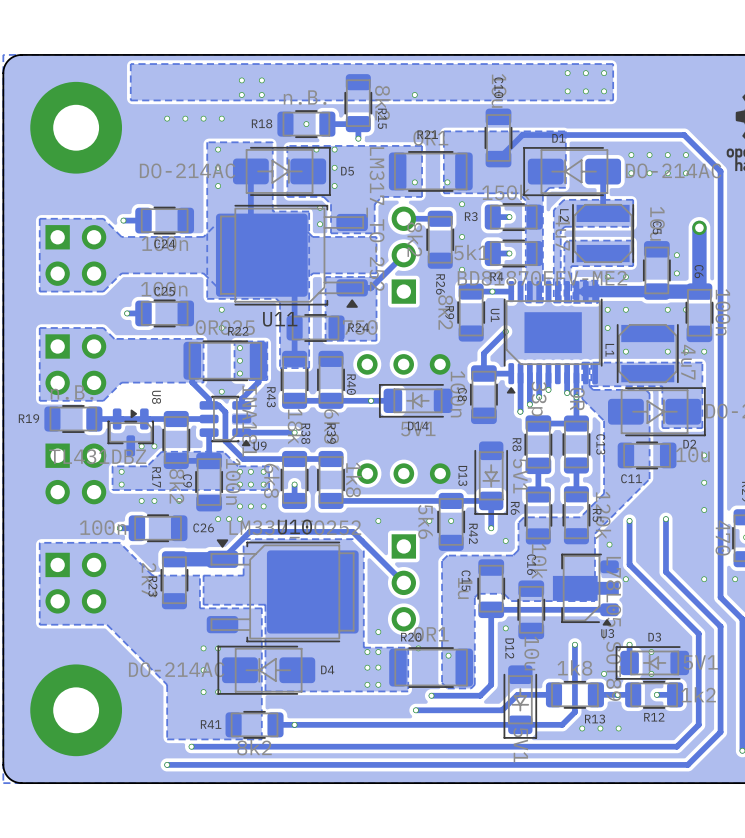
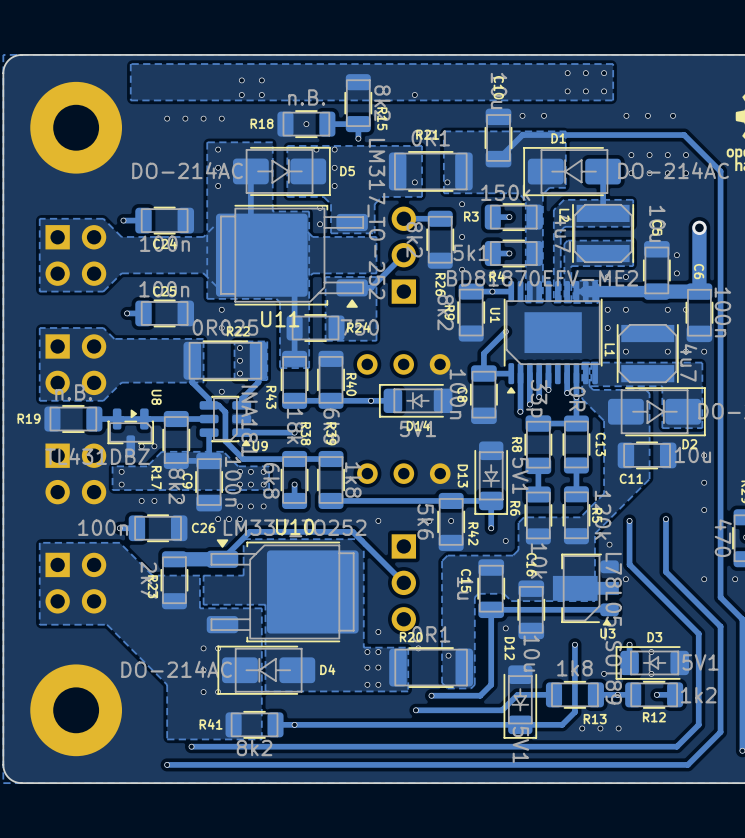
via: none -> (522, 115)
via: none -> (544, 115)
via: none -> (626, 115)
via: none -> (647, 115)
via: none -> (673, 115)

